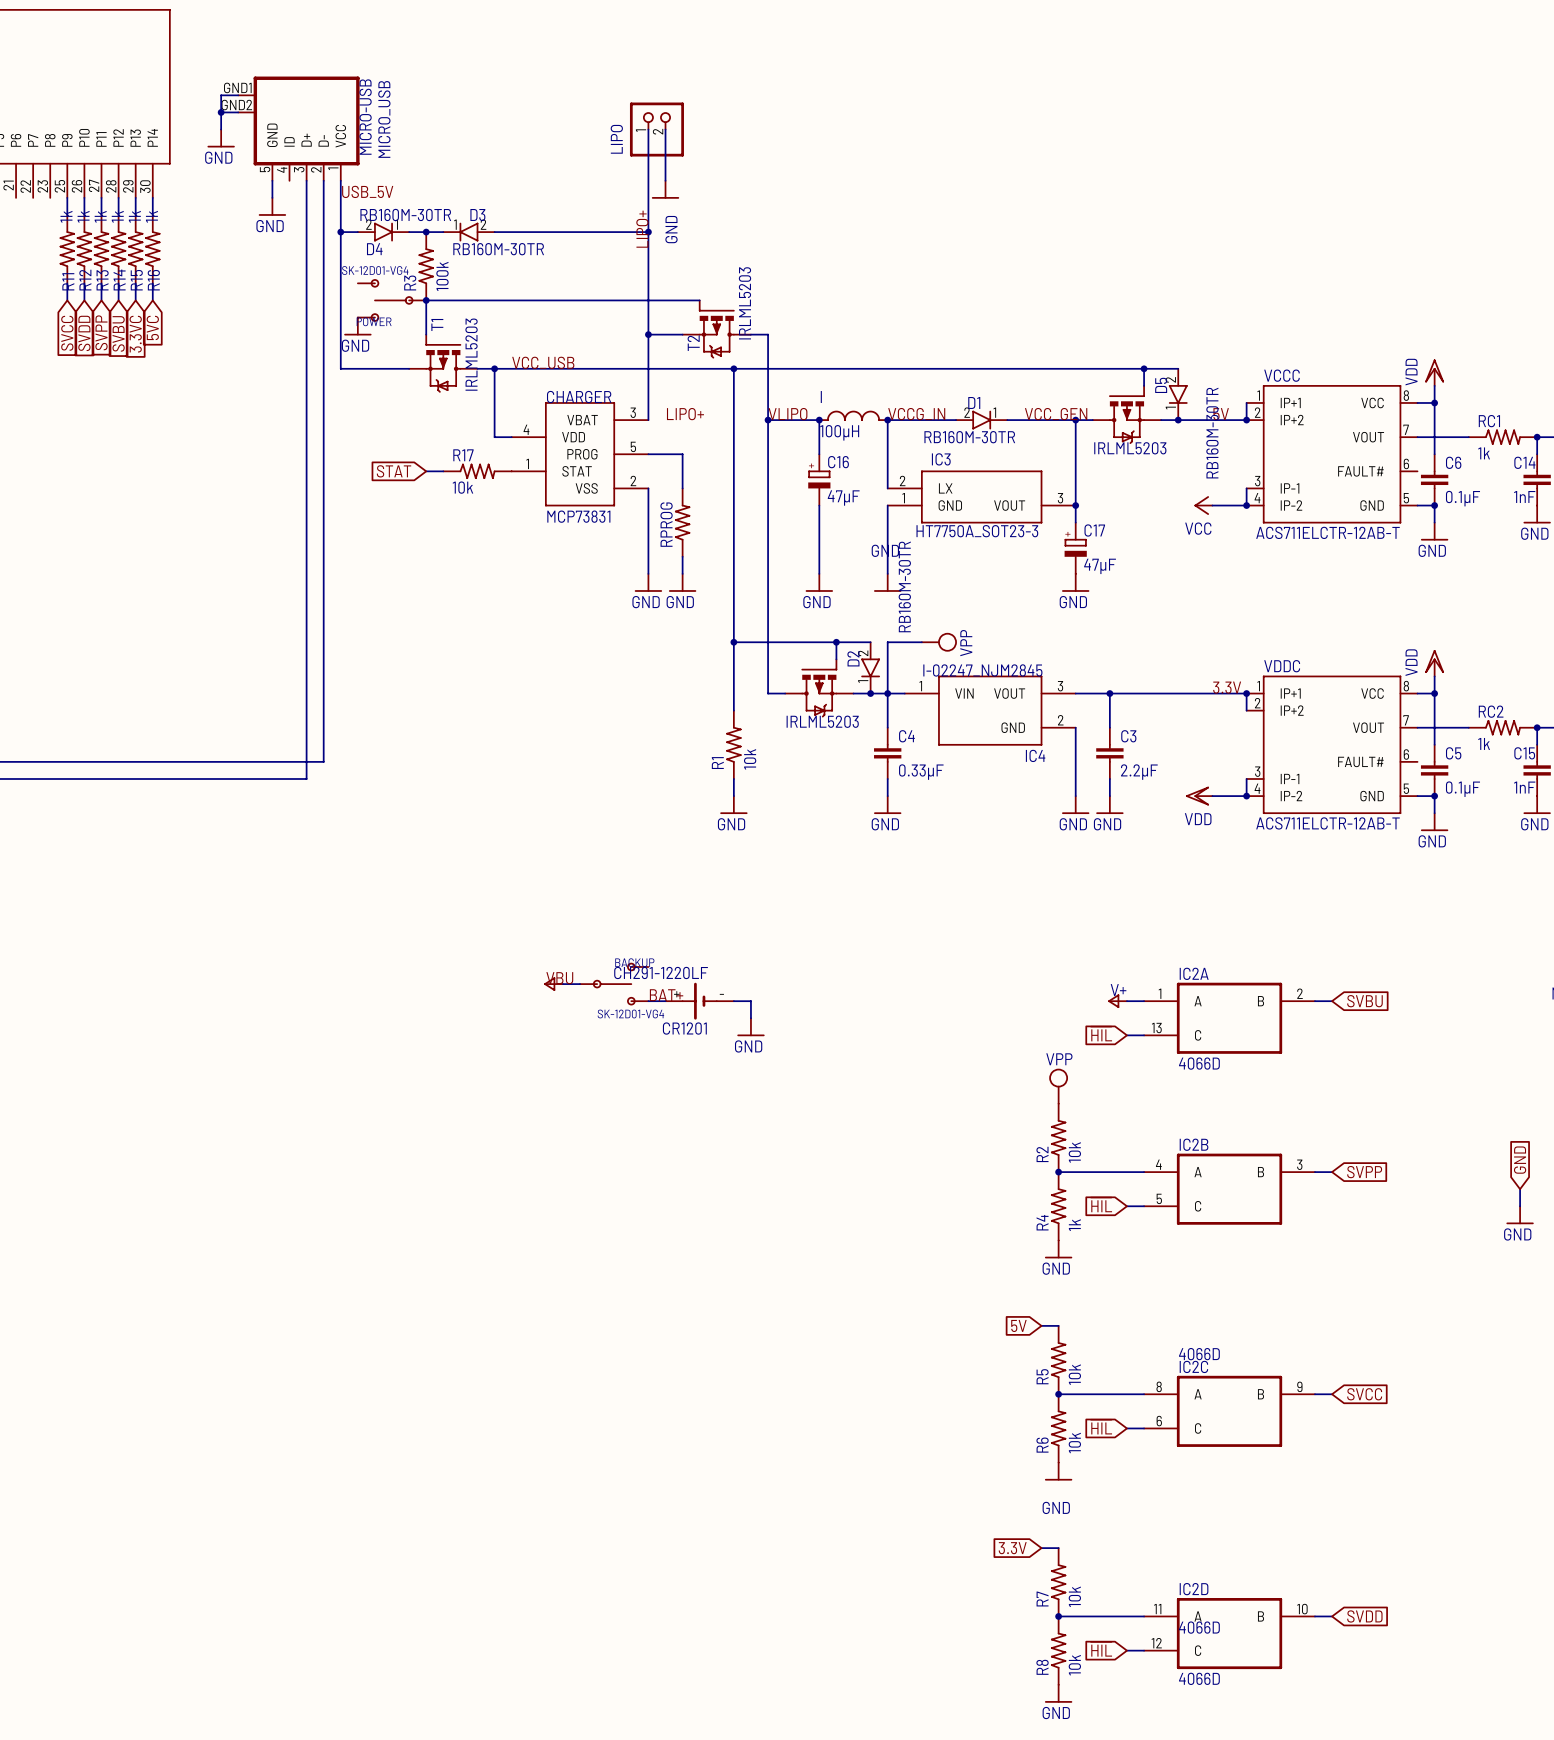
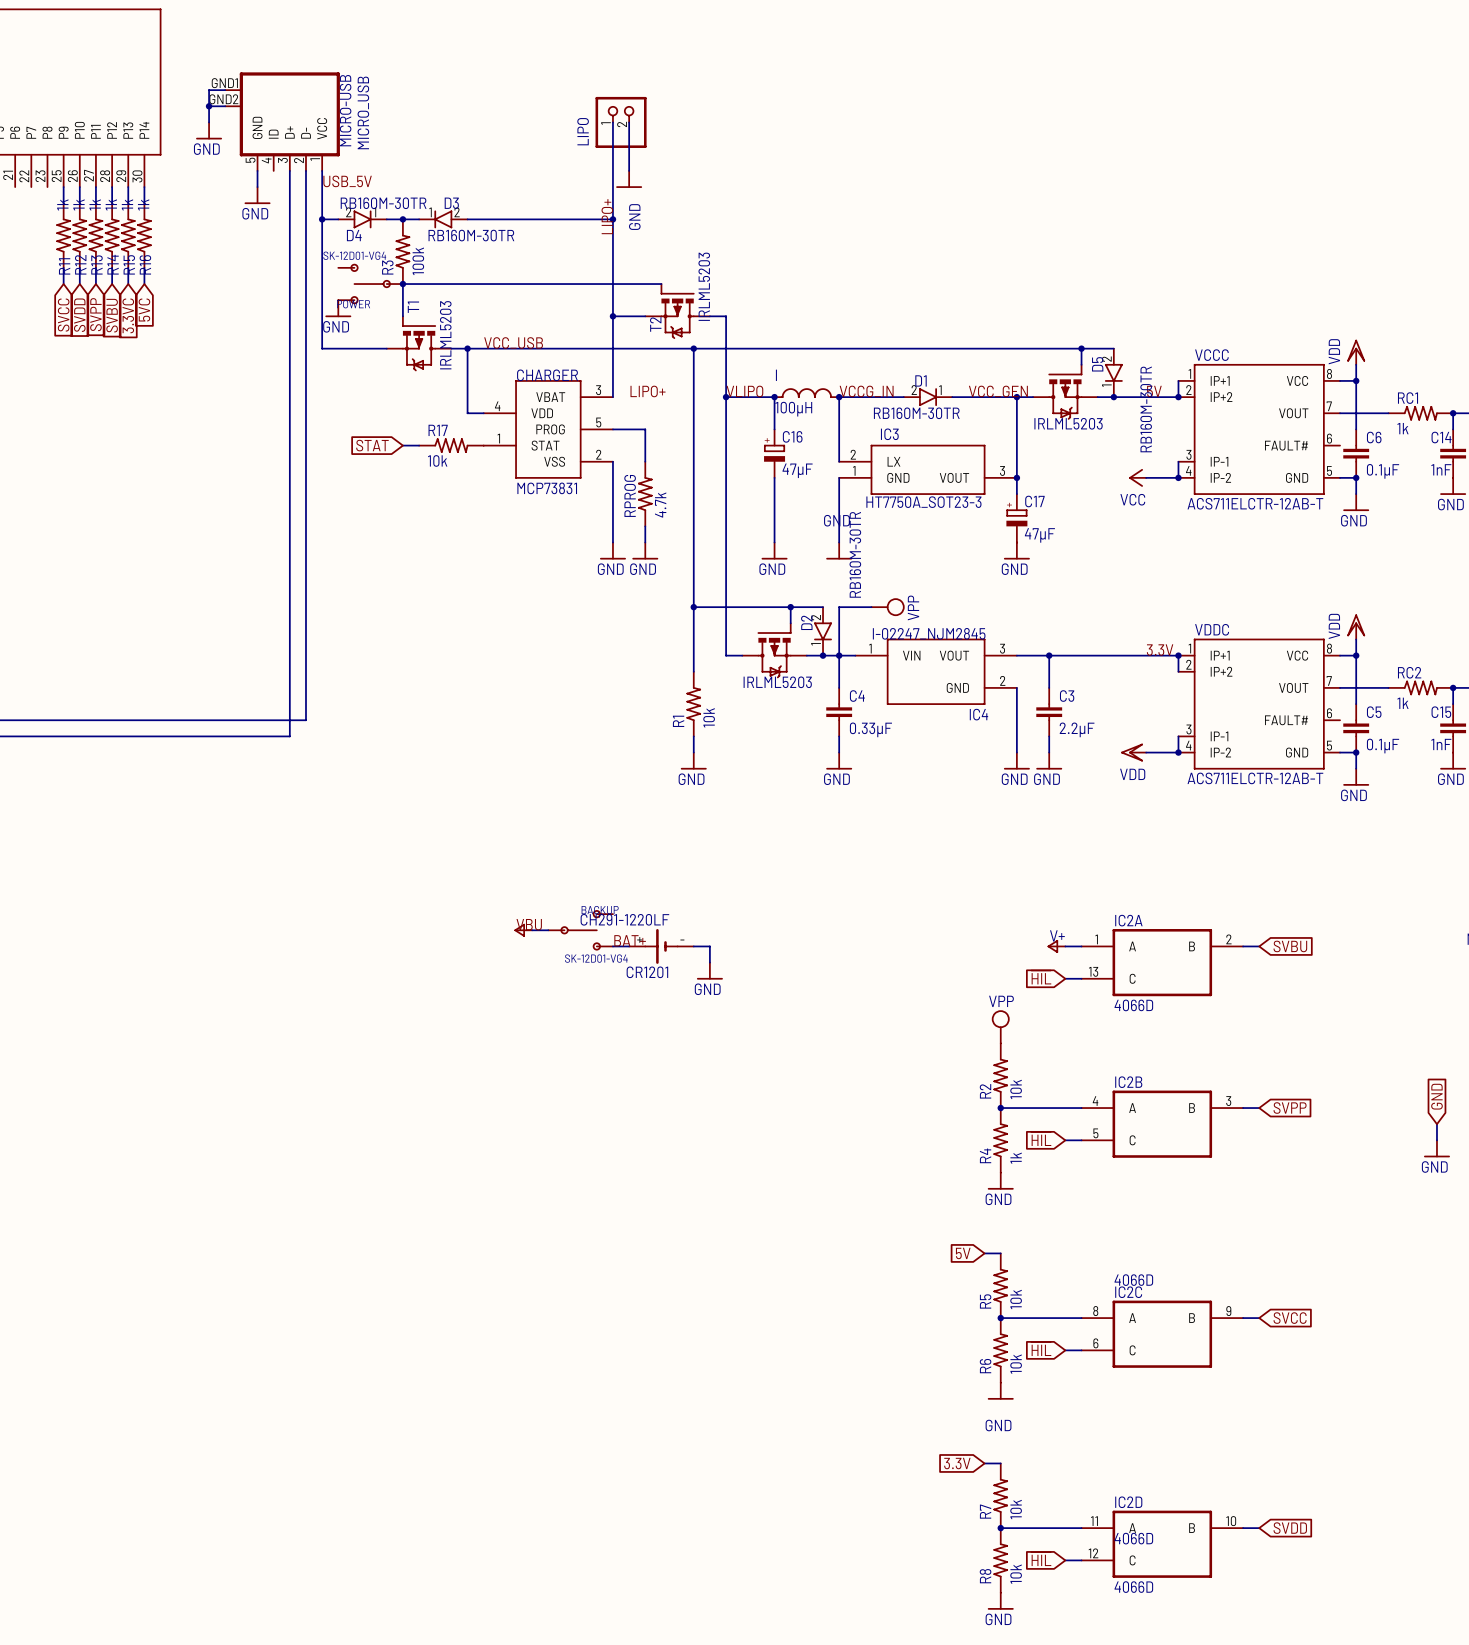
RPROG value: none -> 4.7k (660, 505)

